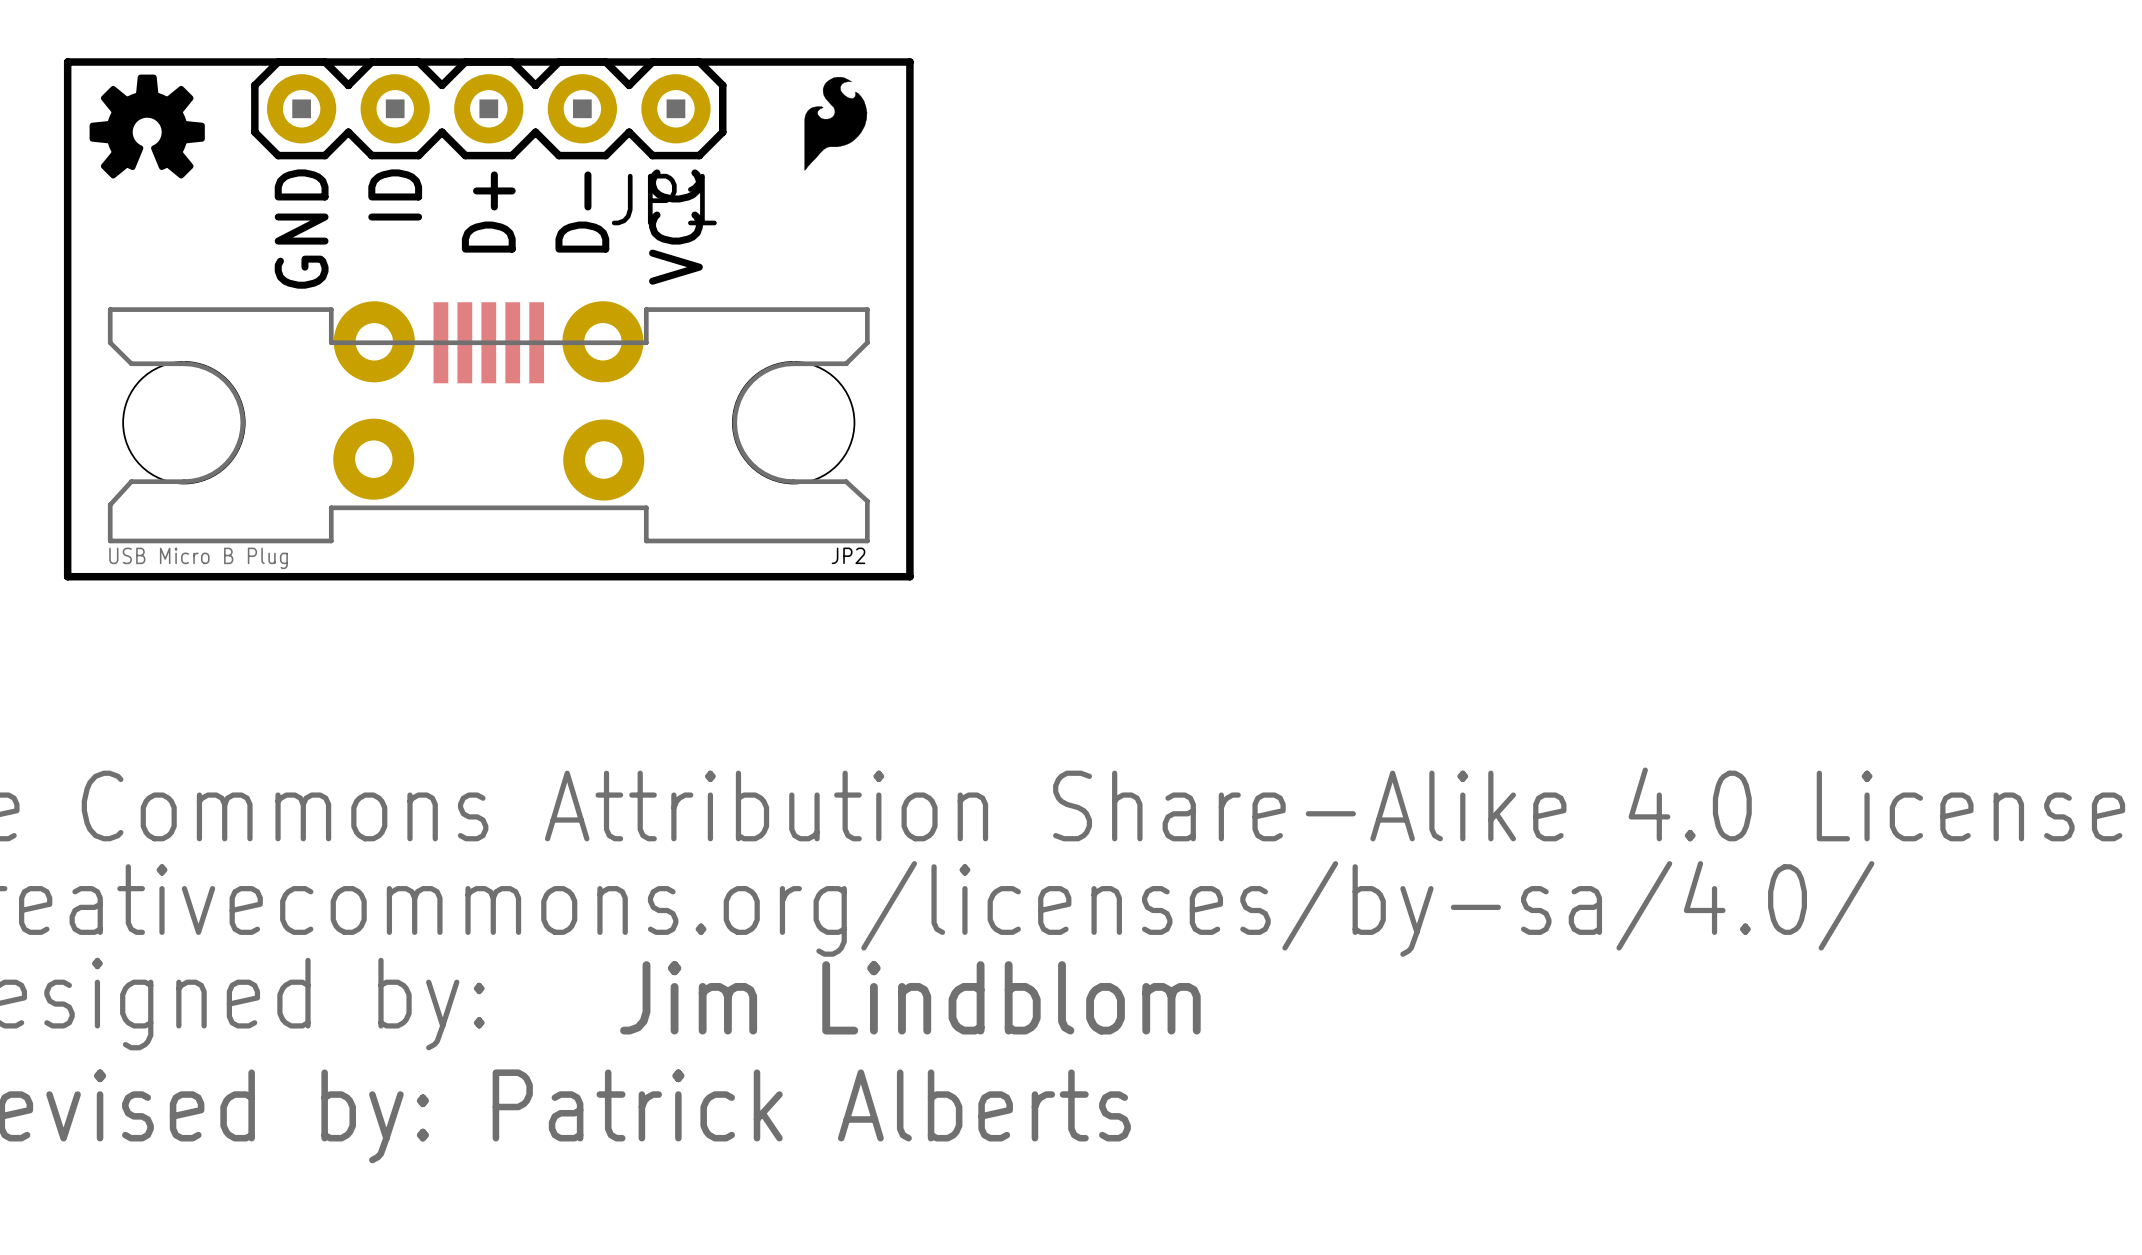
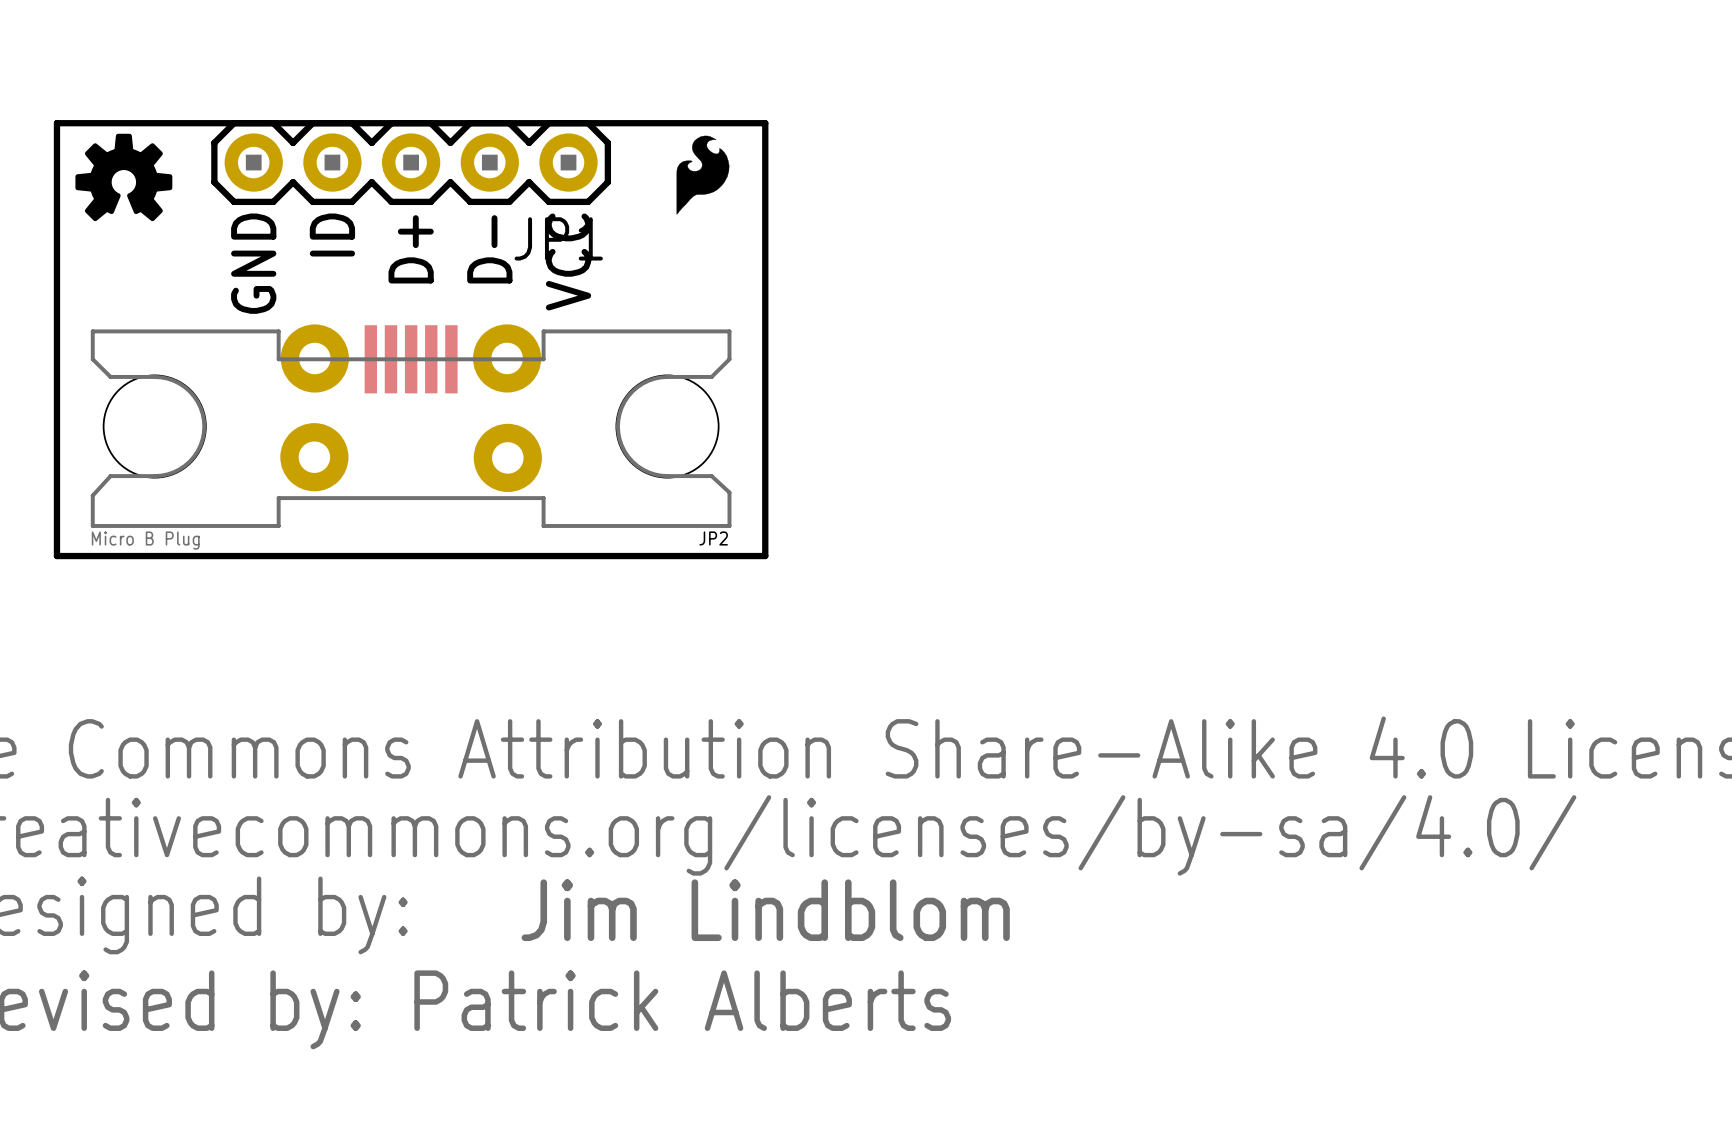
JP2 value: USB Micro B Plug (198, 558) -> Micro B Plug (145, 540)

